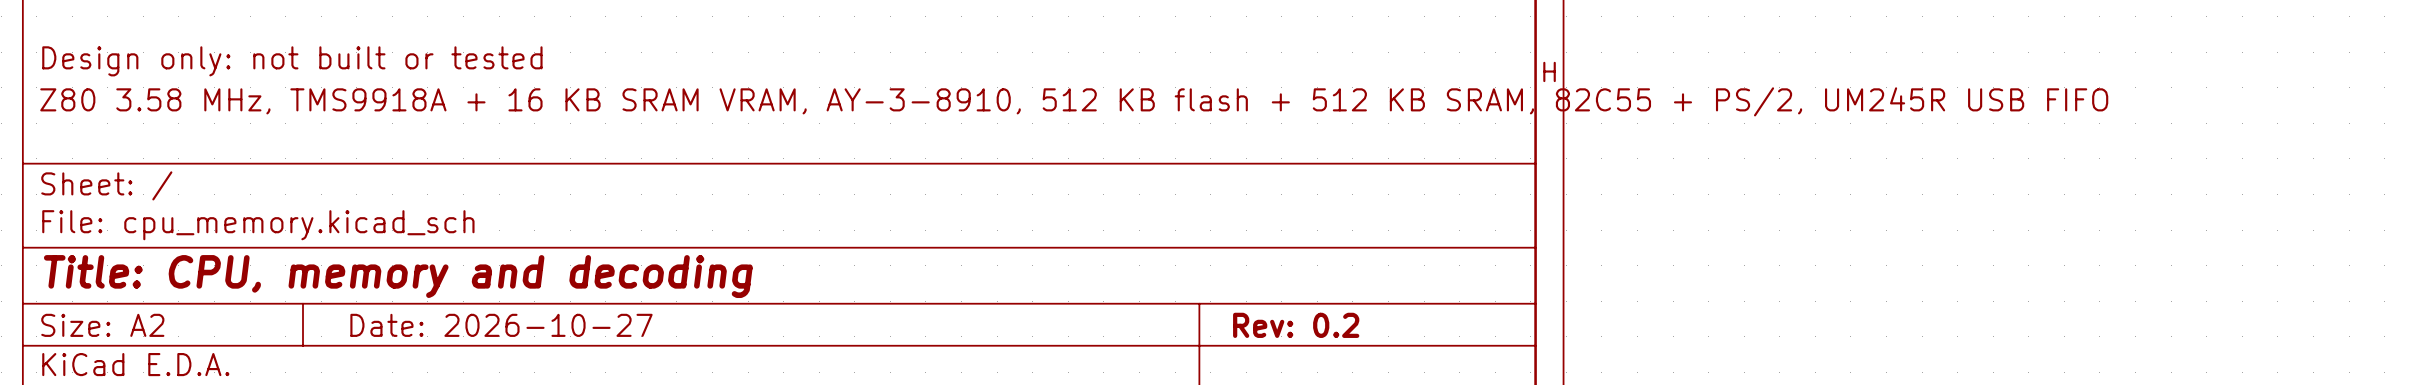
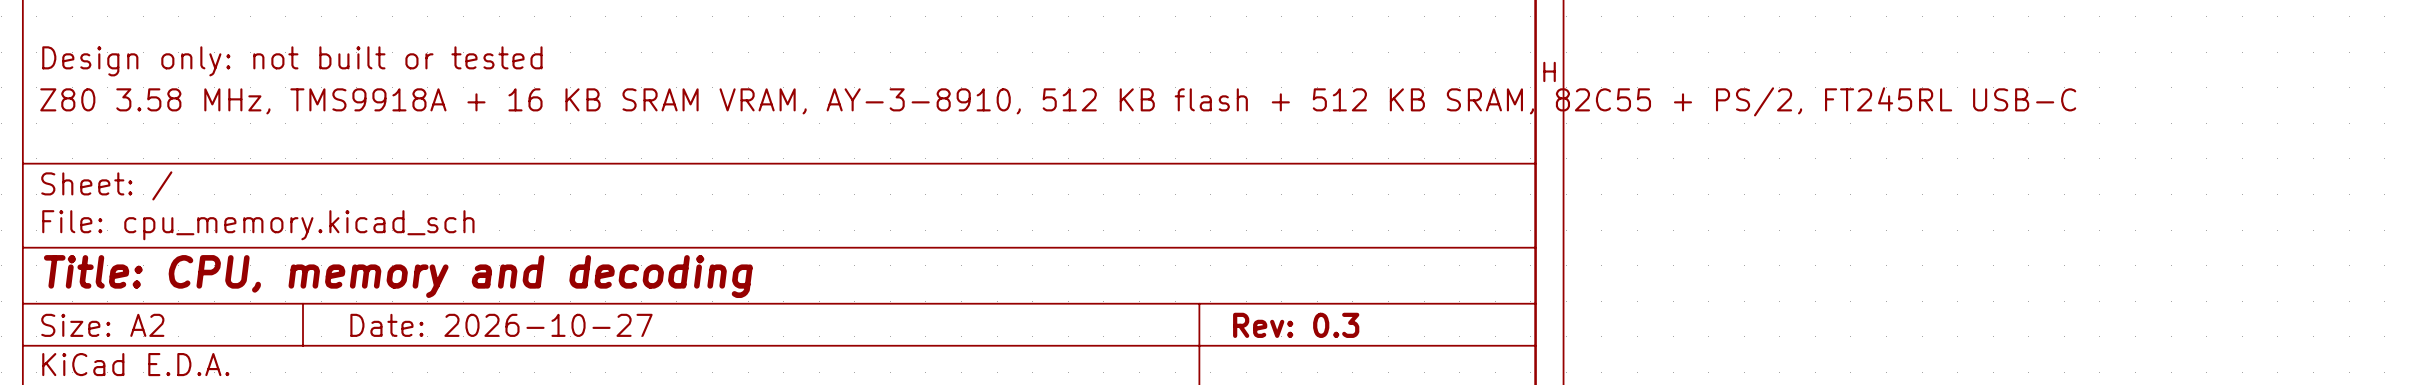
title block: Z80 3.58 MHz, TMS9918A + 16 KB SRAM VRAM, AY-3-8910, 512 KB flash + 512 KB SRAM, 82C55 + PS/2, UM245R USB FIFO (1074, 101) -> Z80 3.58 MHz, TMS9918A + 16 KB SRAM VRAM, AY-3-8910, 512 KB flash + 512 KB SRAM, 82C55 + PS/2, FT245RL USB-C (1058, 101)
title block: Rev: 0.2 (1296, 325) -> Rev: 0.3 (1296, 325)

